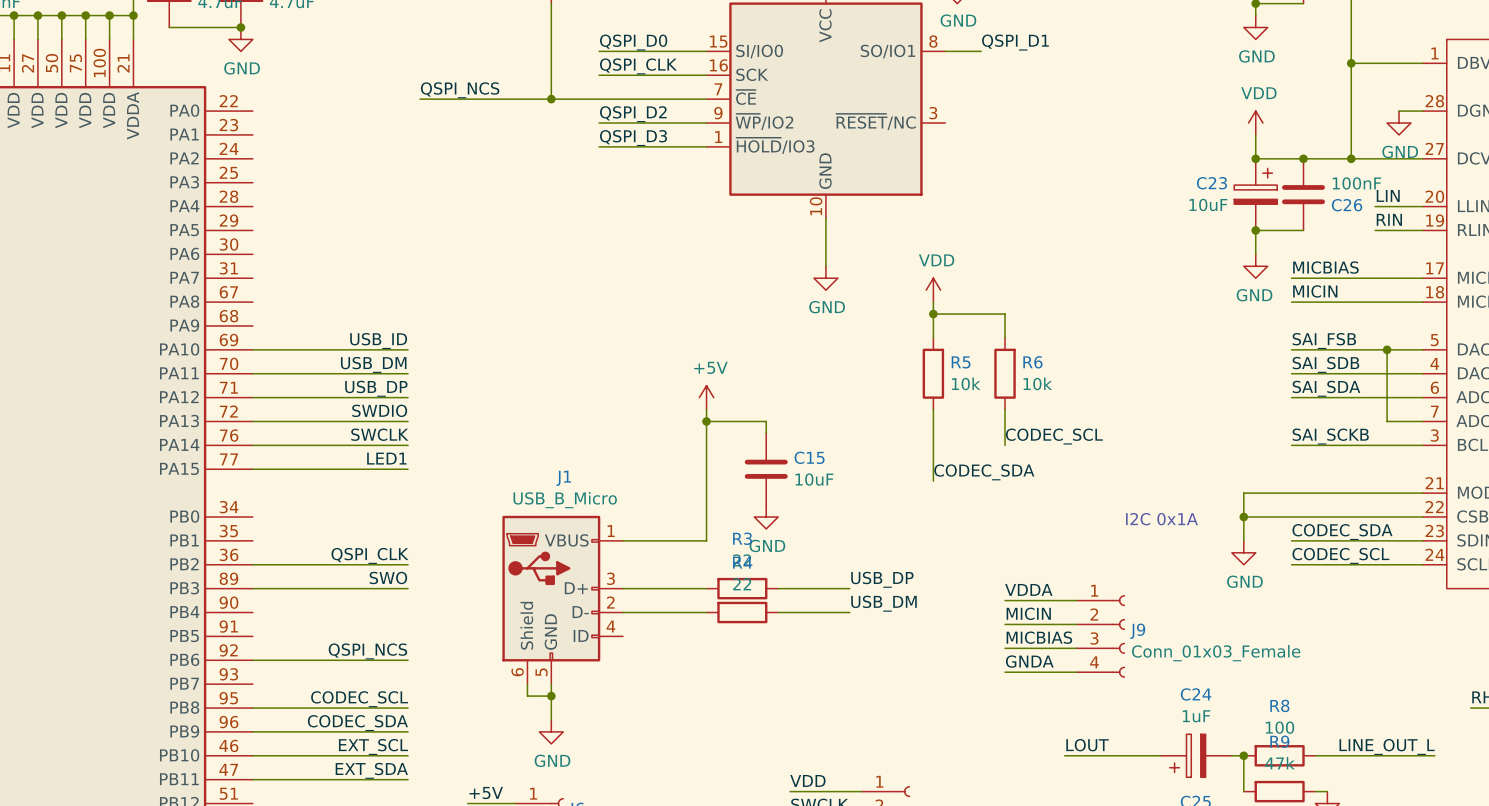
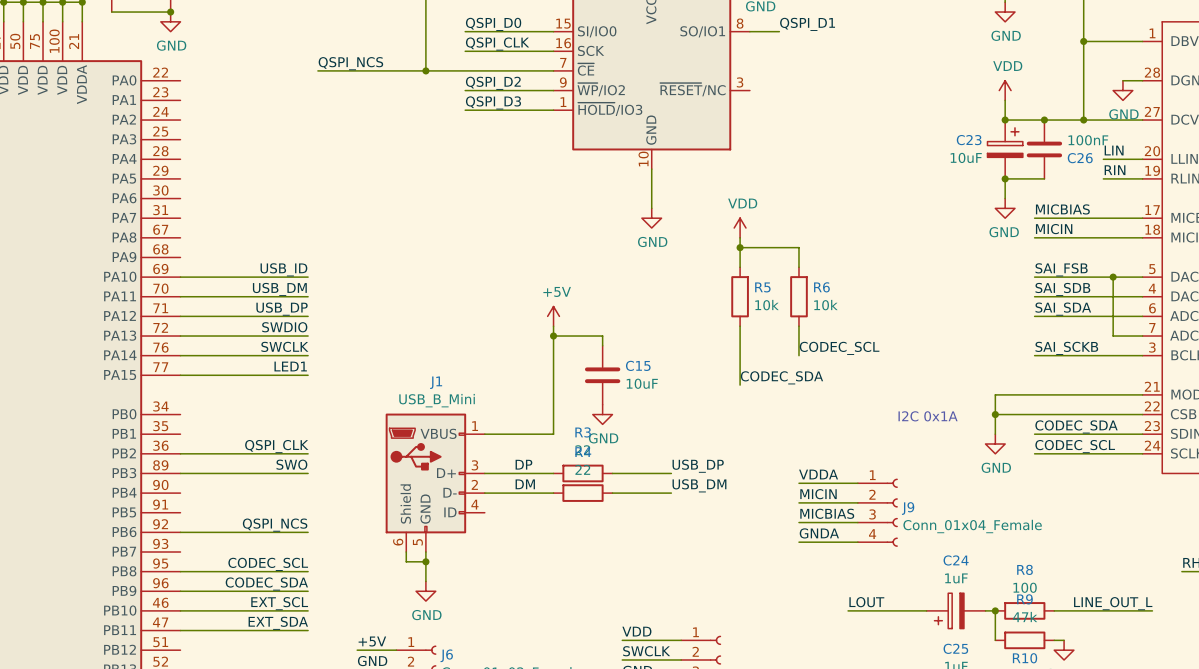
J1 value: USB_B_Micro (565, 500) -> USB_B_Mini (437, 400)
label: none -> DP (523, 464)
label: none -> DM (525, 484)
J9 value: Conn_01x03_Female (1216, 653) -> Conn_01x04_Female (972, 526)

